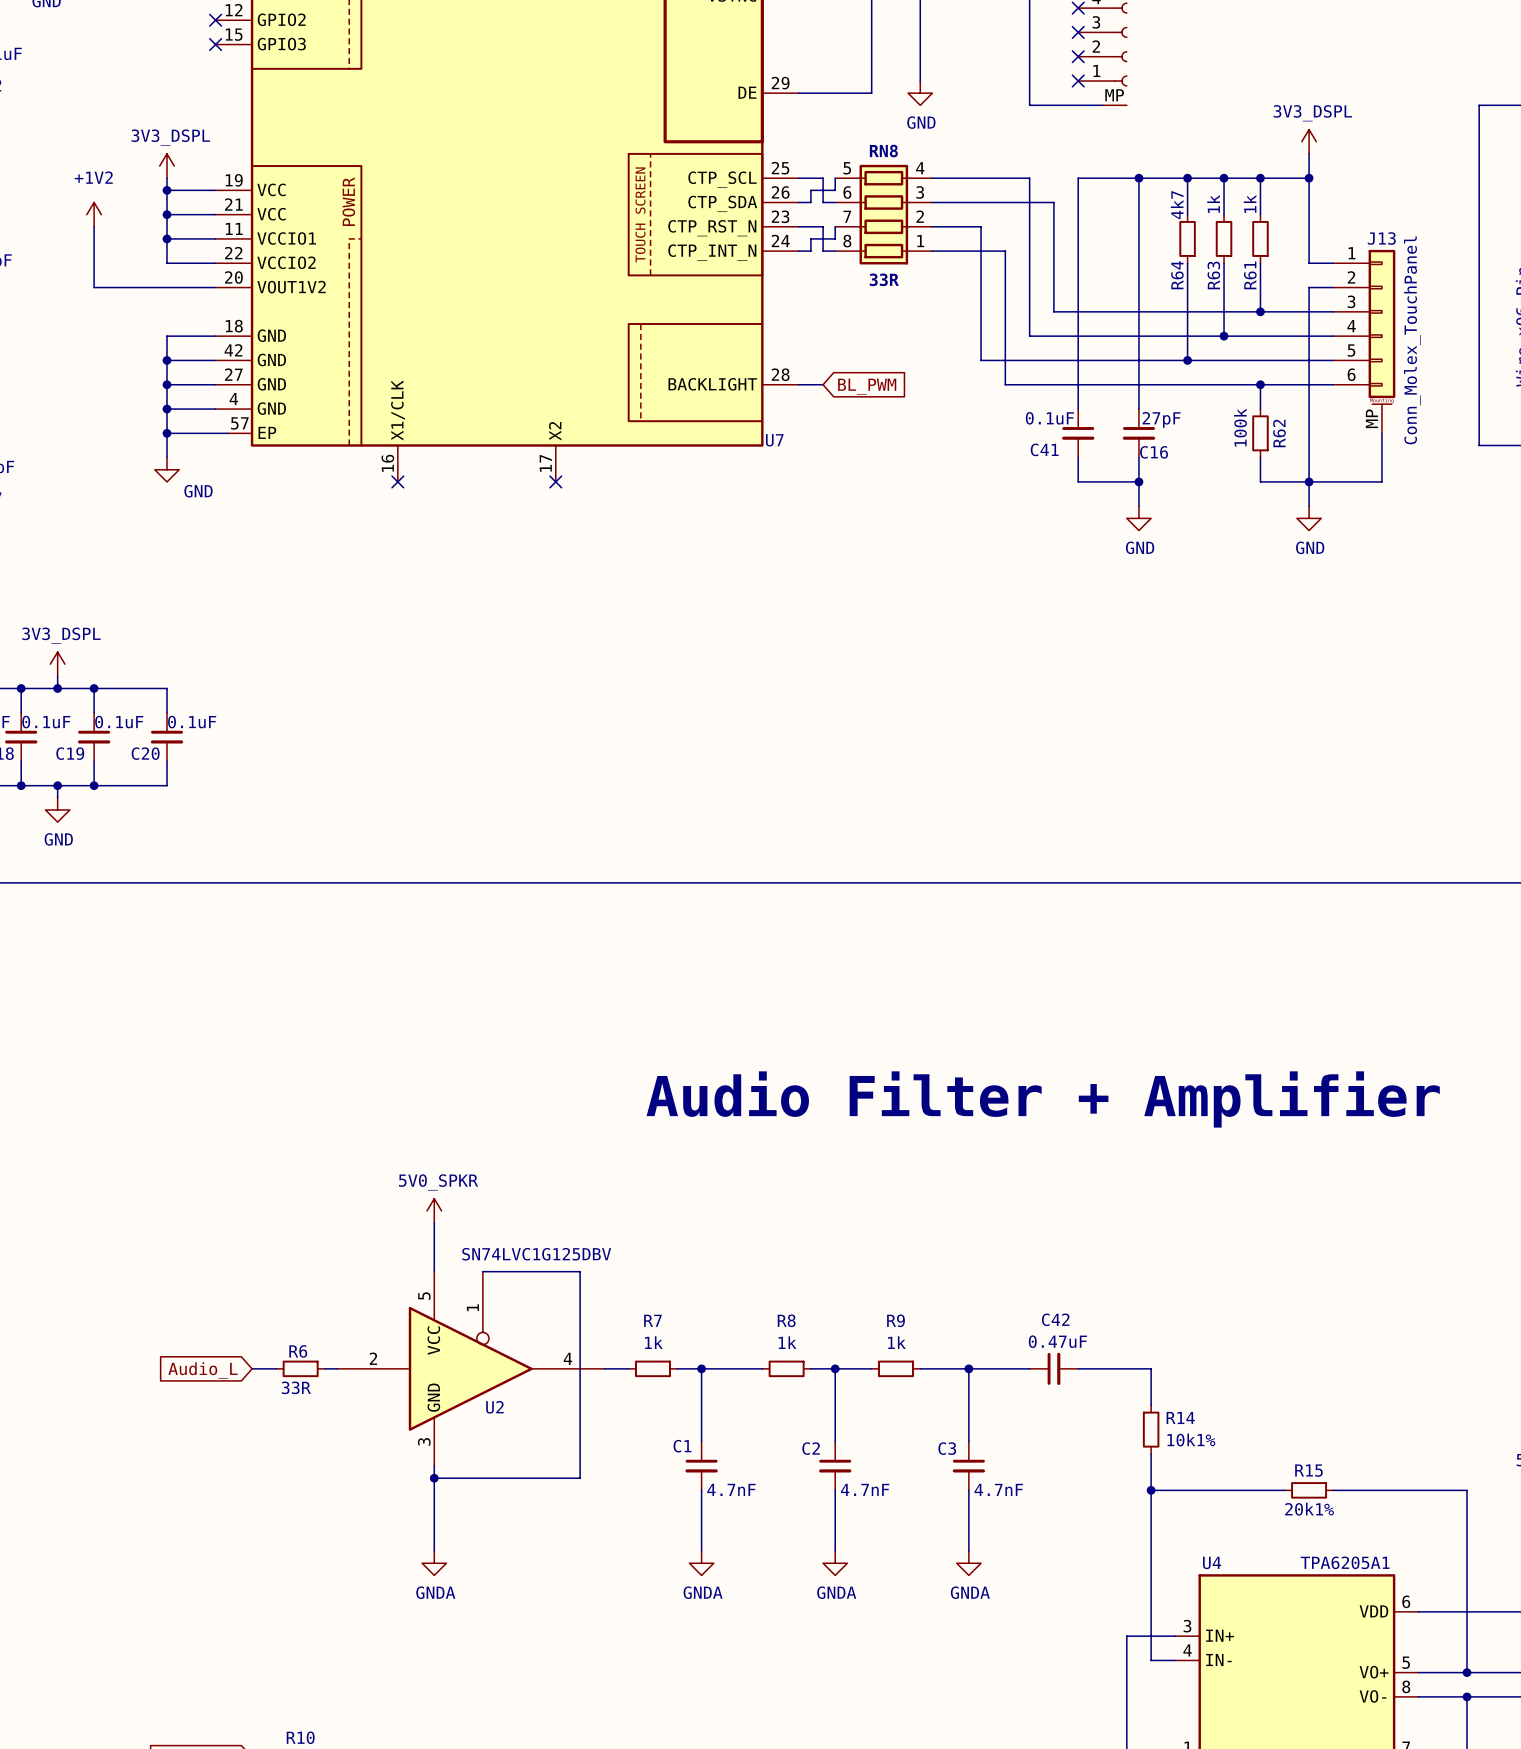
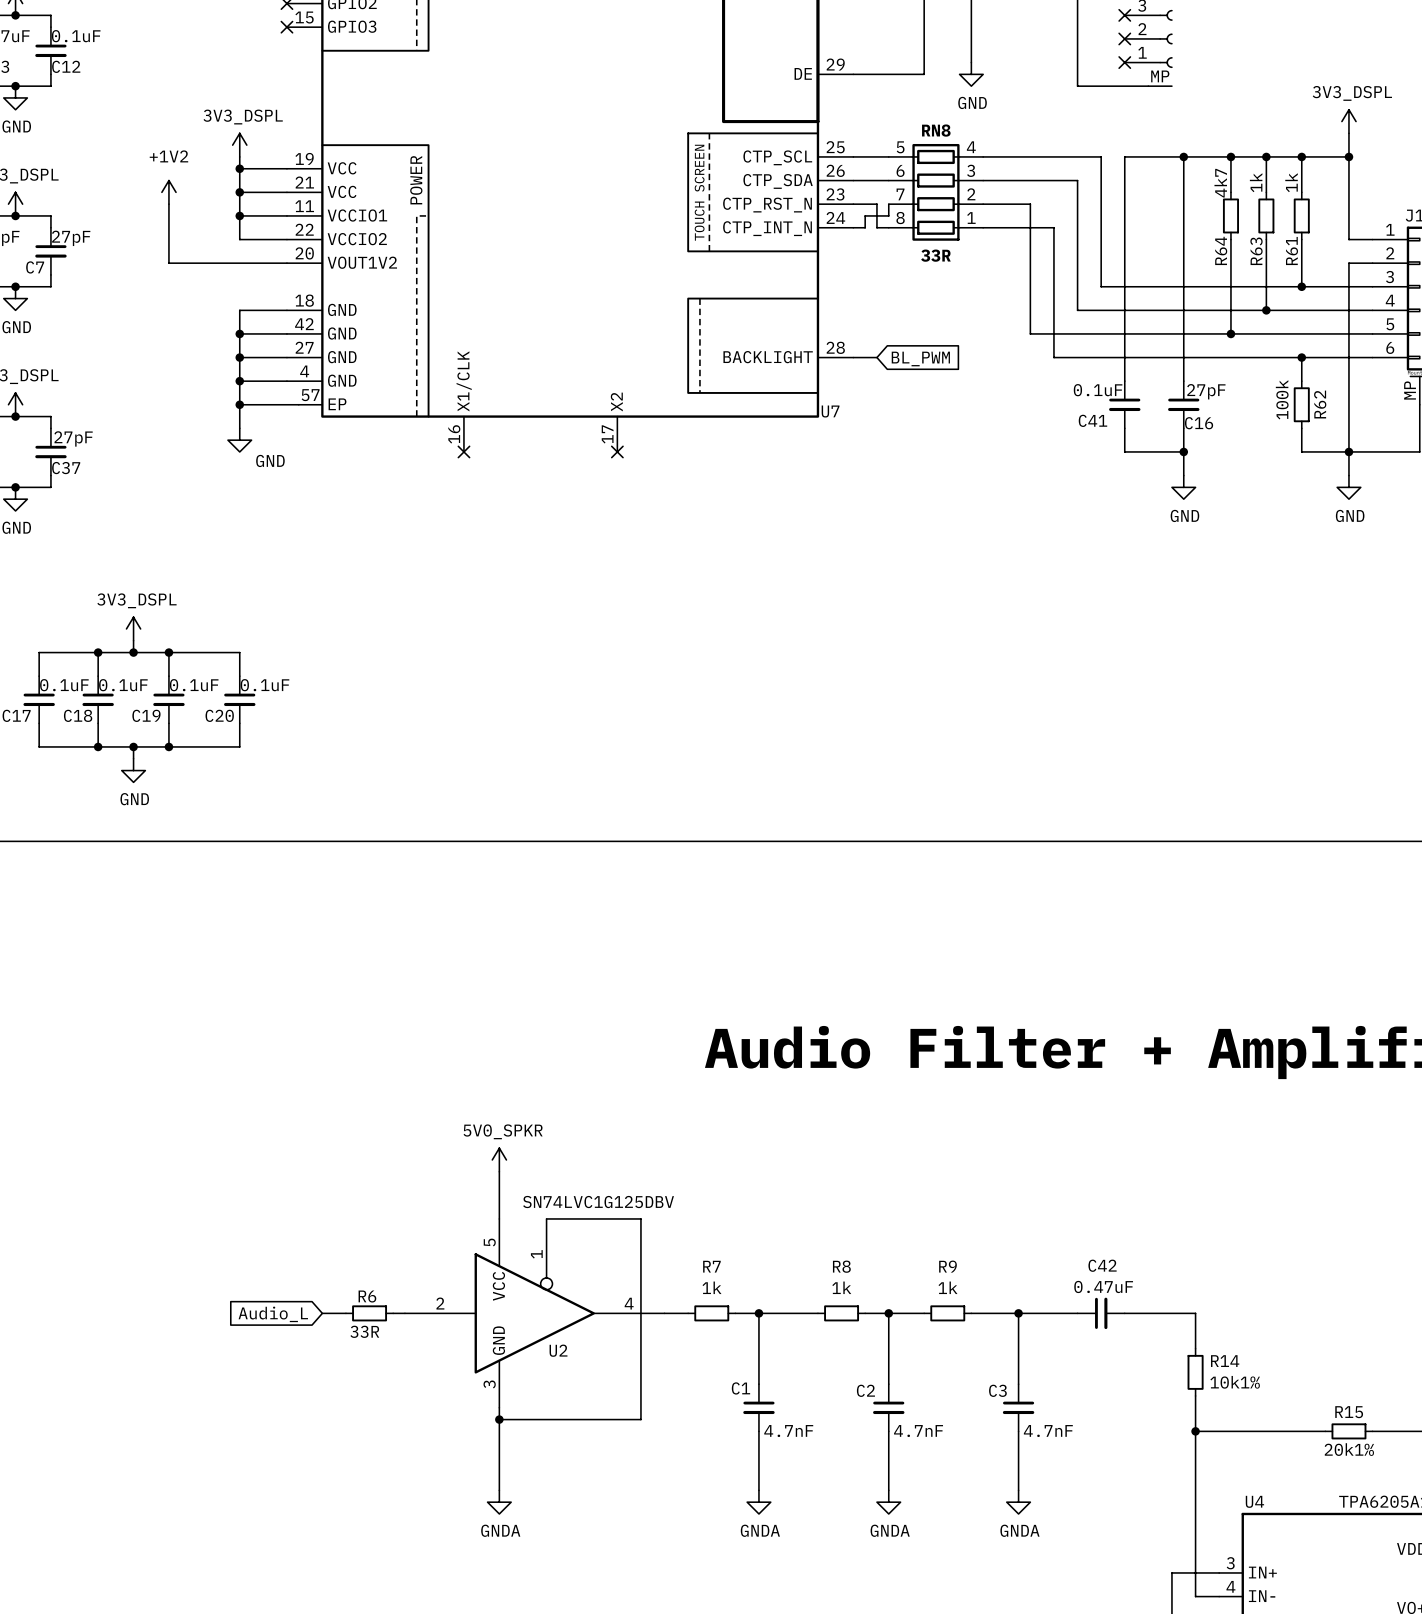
wire: (823, 178) (823, 202) -> (865, 180) (876, 180)
wire: (835, 178) (835, 190) (810, 190) (810, 202) -> (888, 156) (876, 156)
wire: (1029, 178) (1029, 202) (1053, 202) -> (1077, 156) (1101, 156) (1101, 180)

